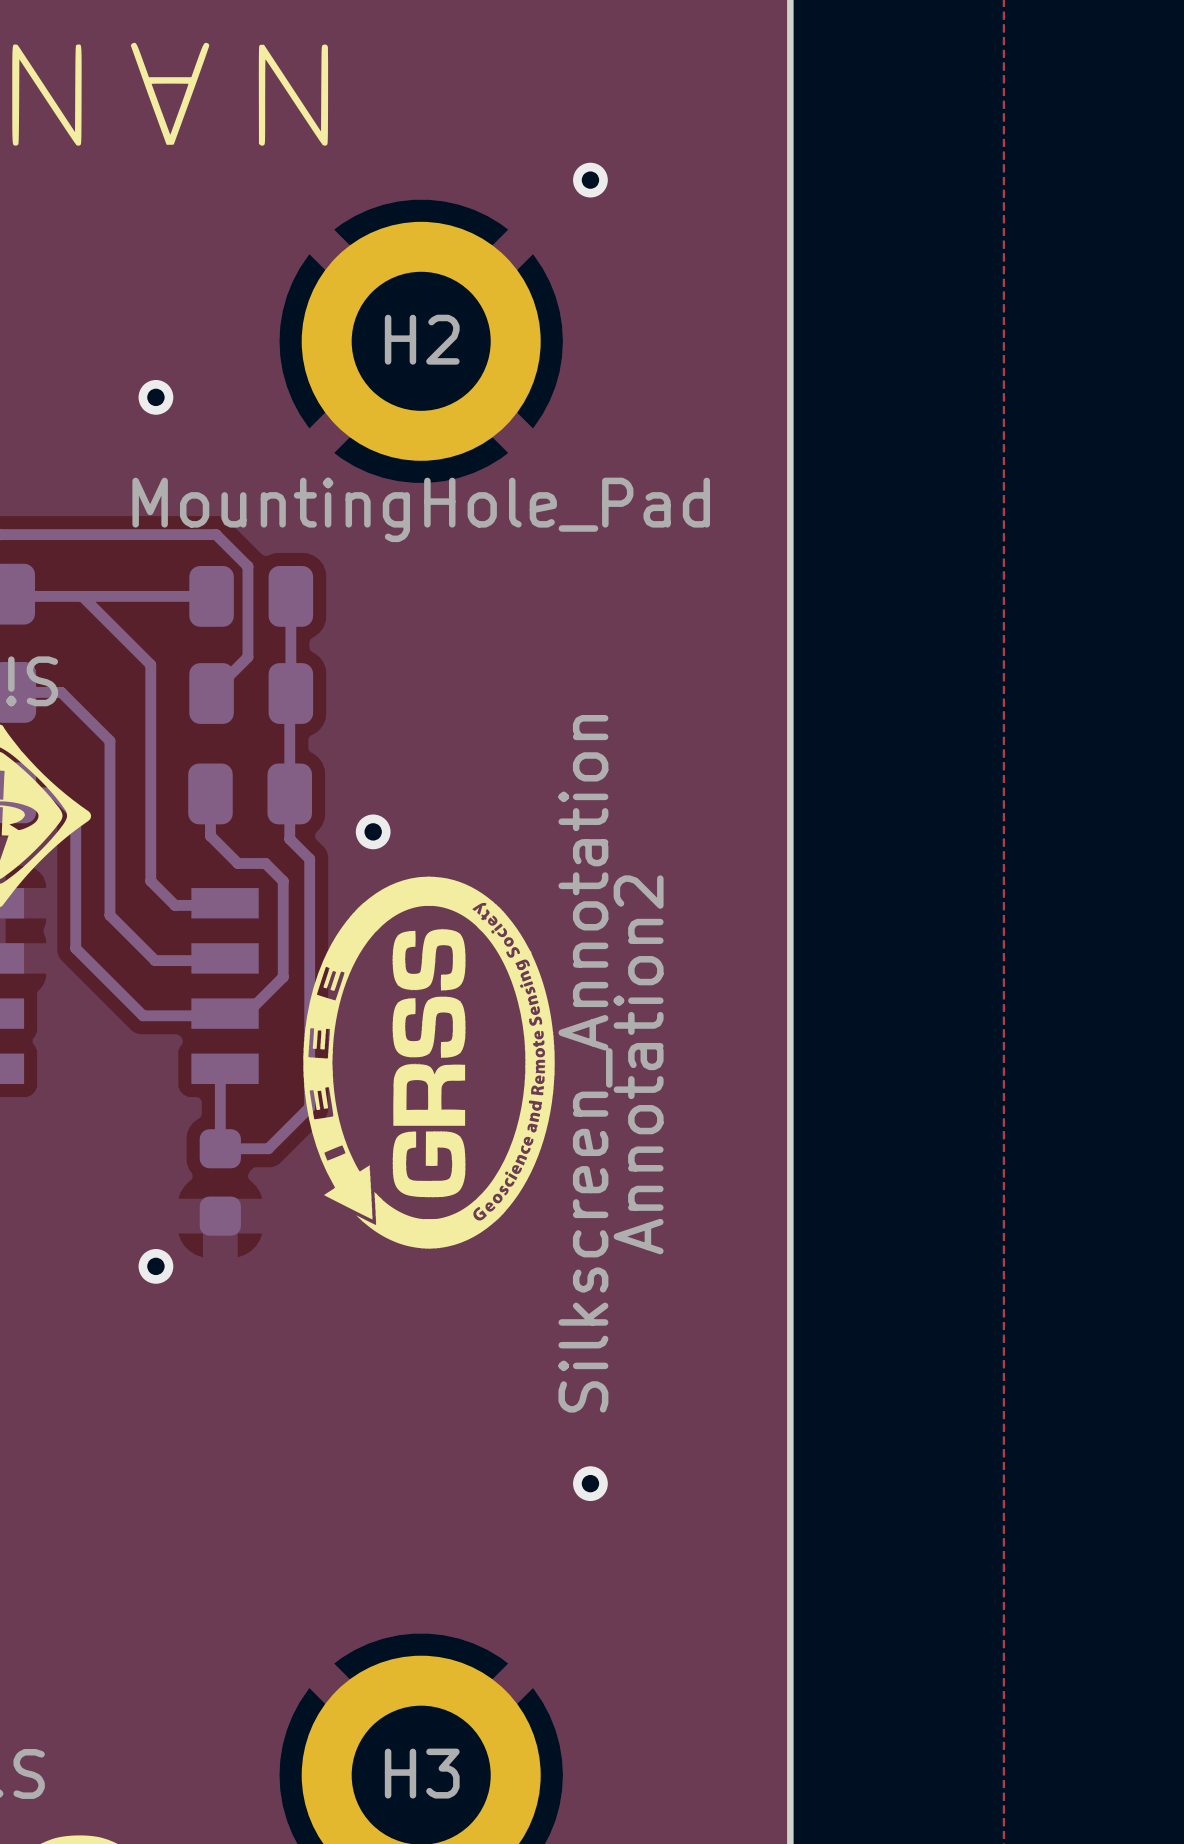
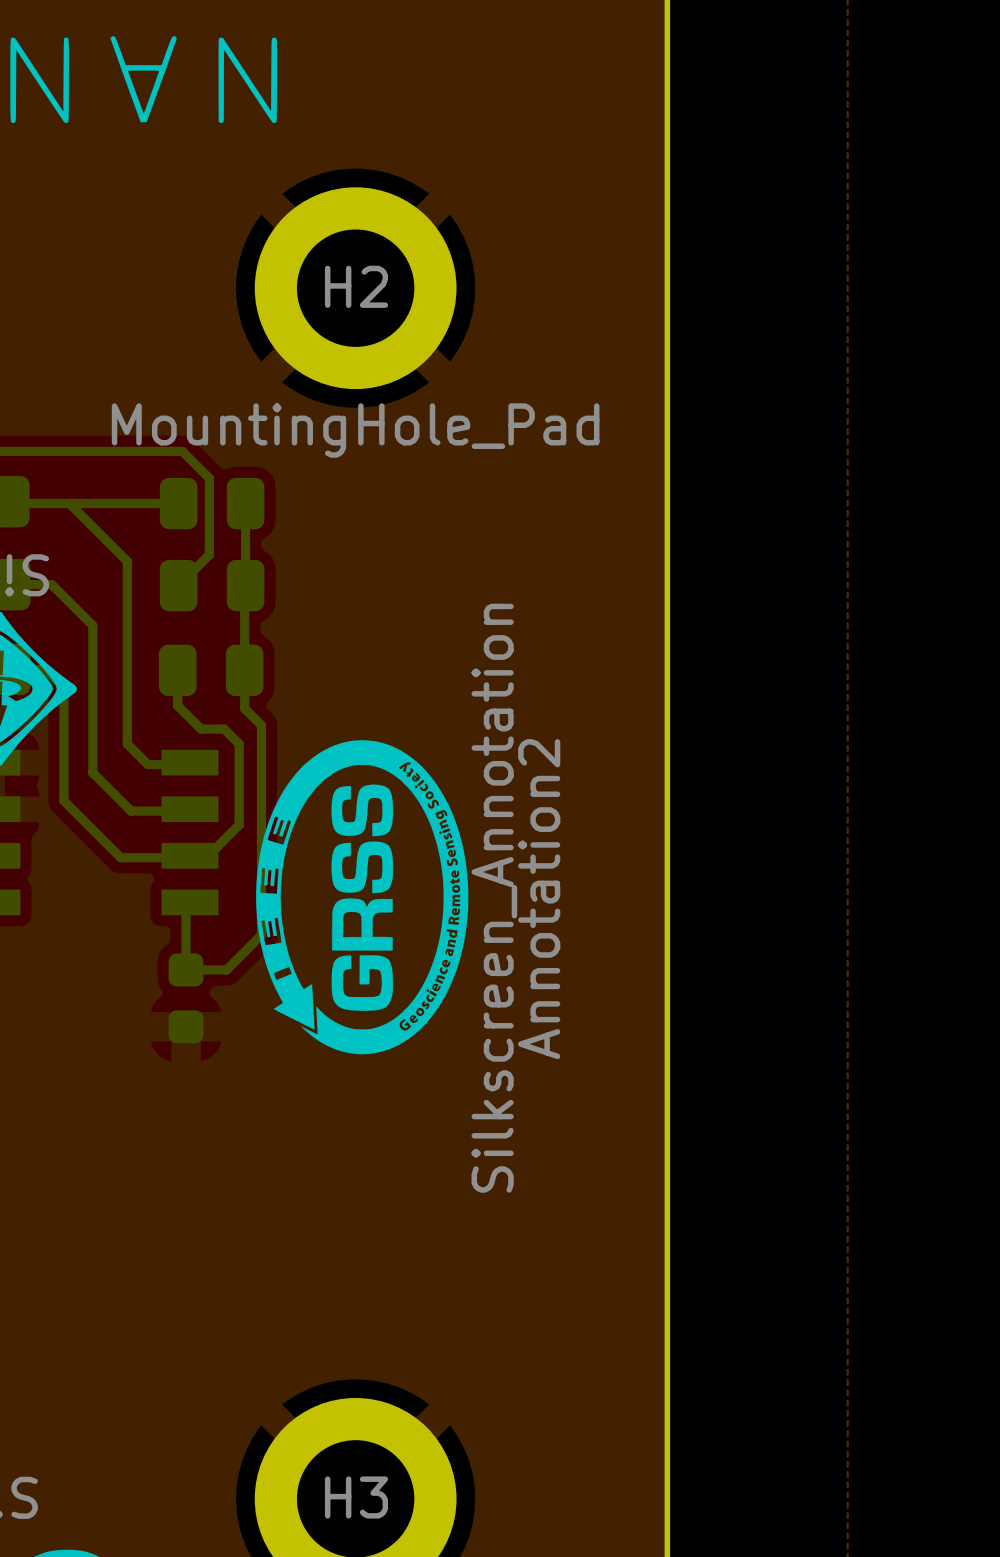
via: (590, 180) -> none
via: (155, 397) -> none
via: (373, 831) -> none
via: (155, 1266) -> none
via: (590, 1483) -> none

